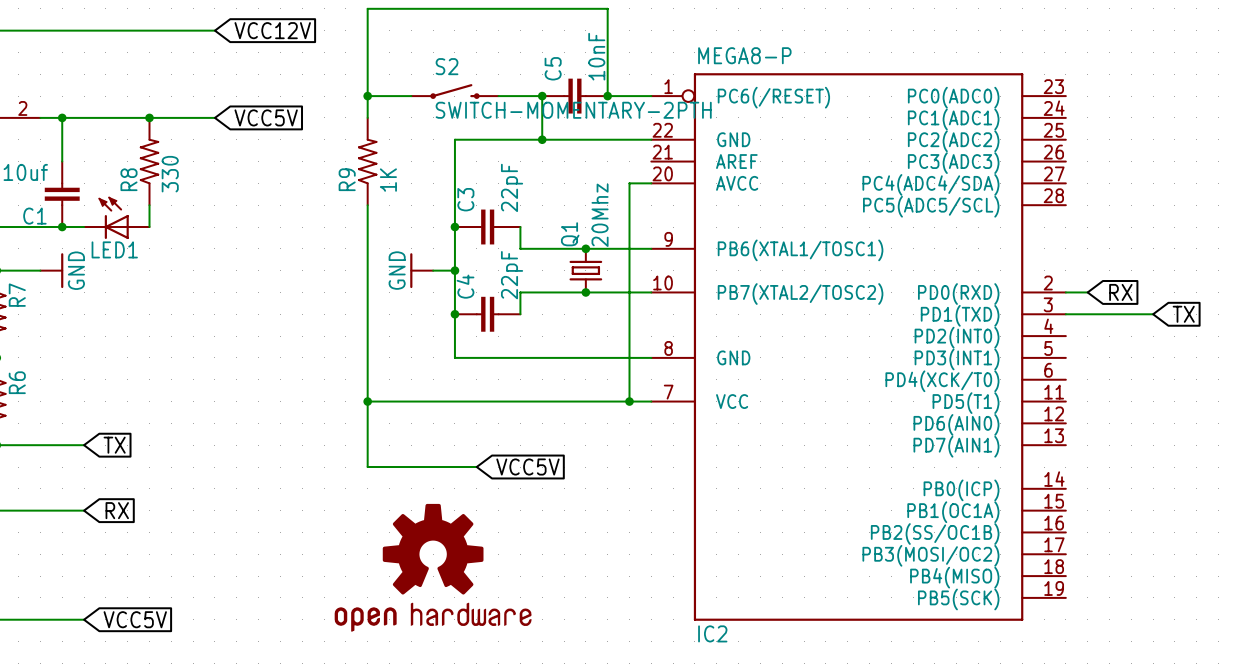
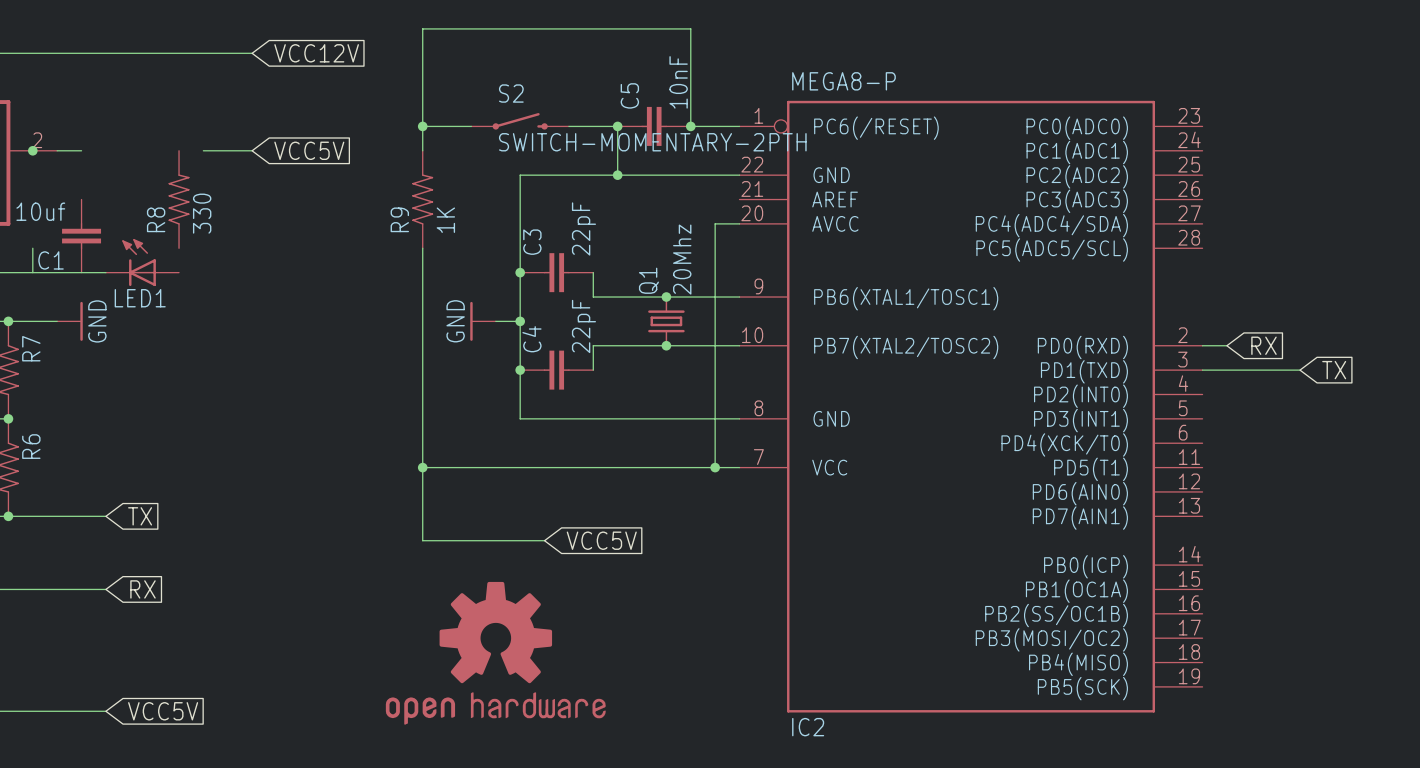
junction position: (62, 117) -> (32, 150)
junction: (149, 117) -> none
wire: (171, 117) (62, 117) (62, 161) -> none
wire: (149, 205) (149, 227) -> (32, 248) (32, 272)
junction: (62, 227) -> none

